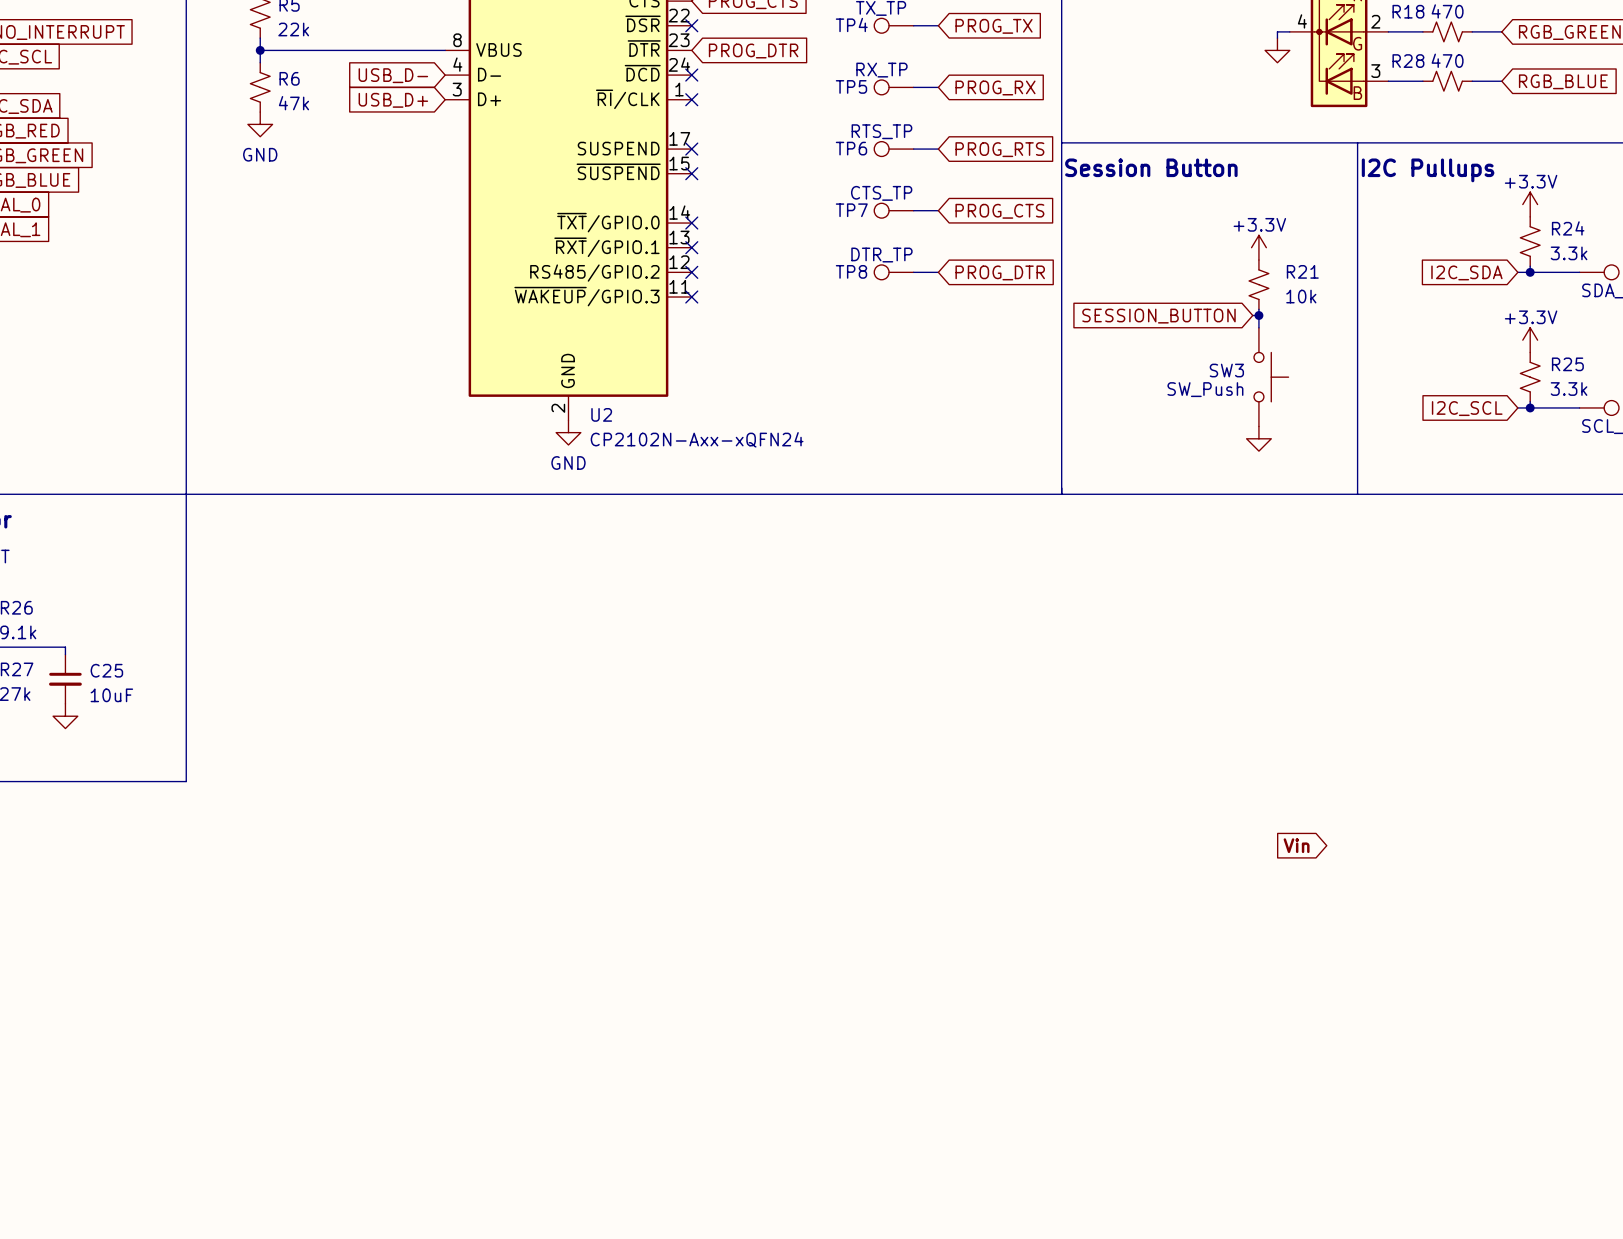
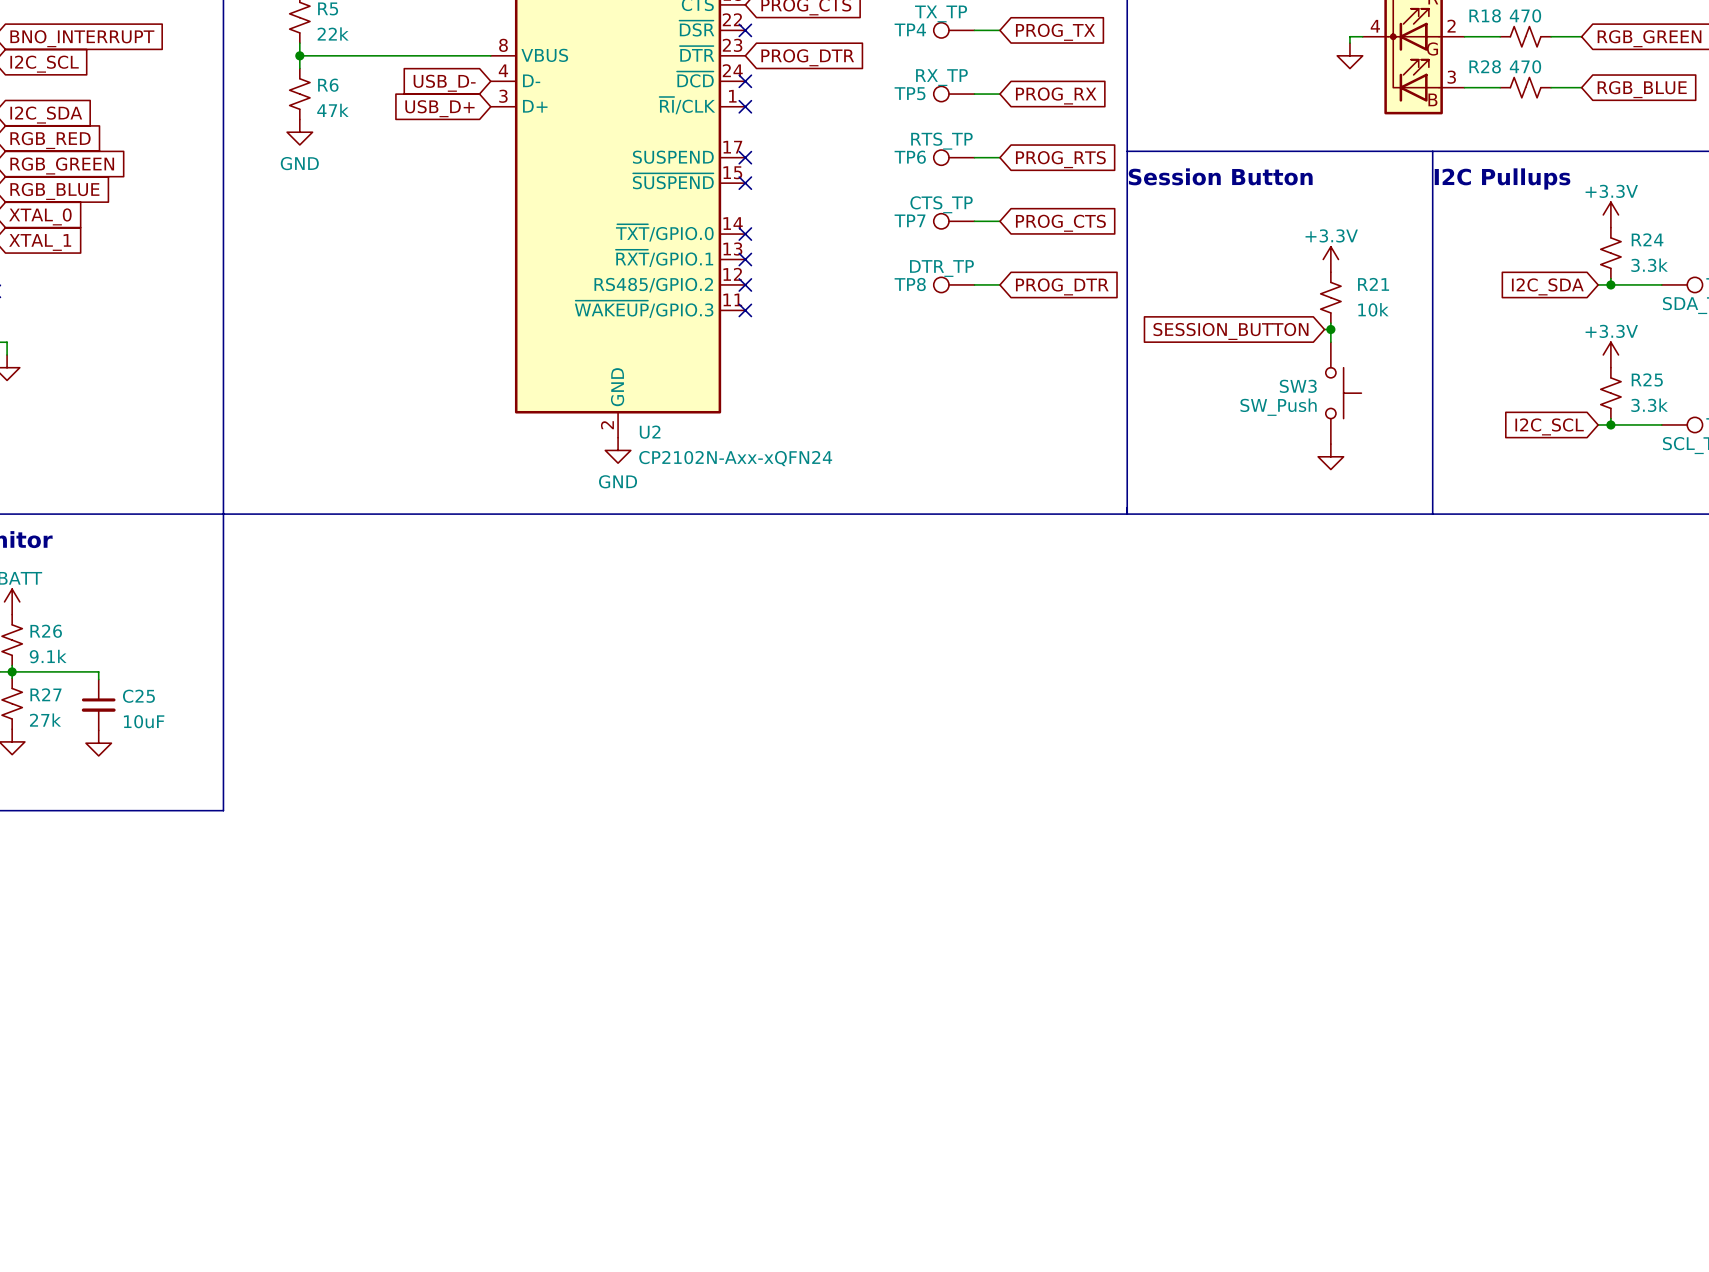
global label: Vin (1296, 845) -> none

